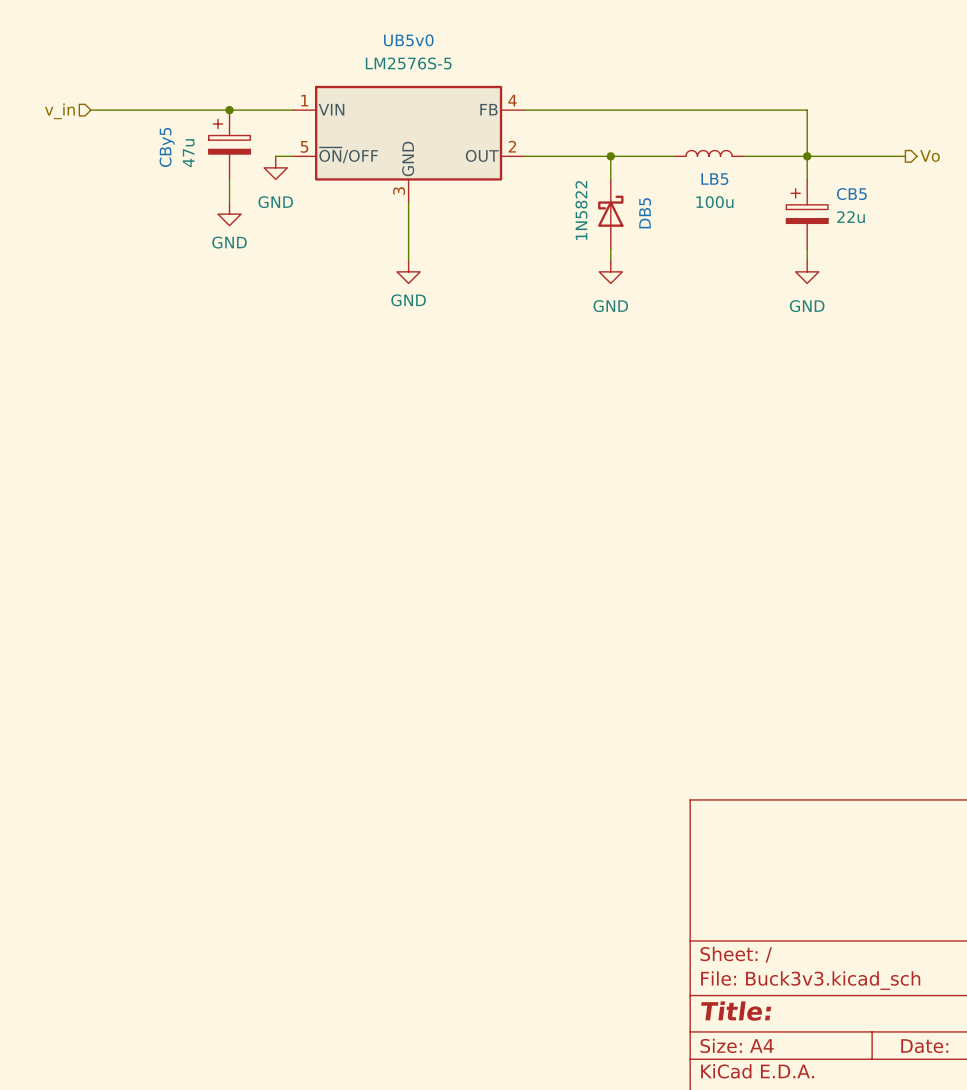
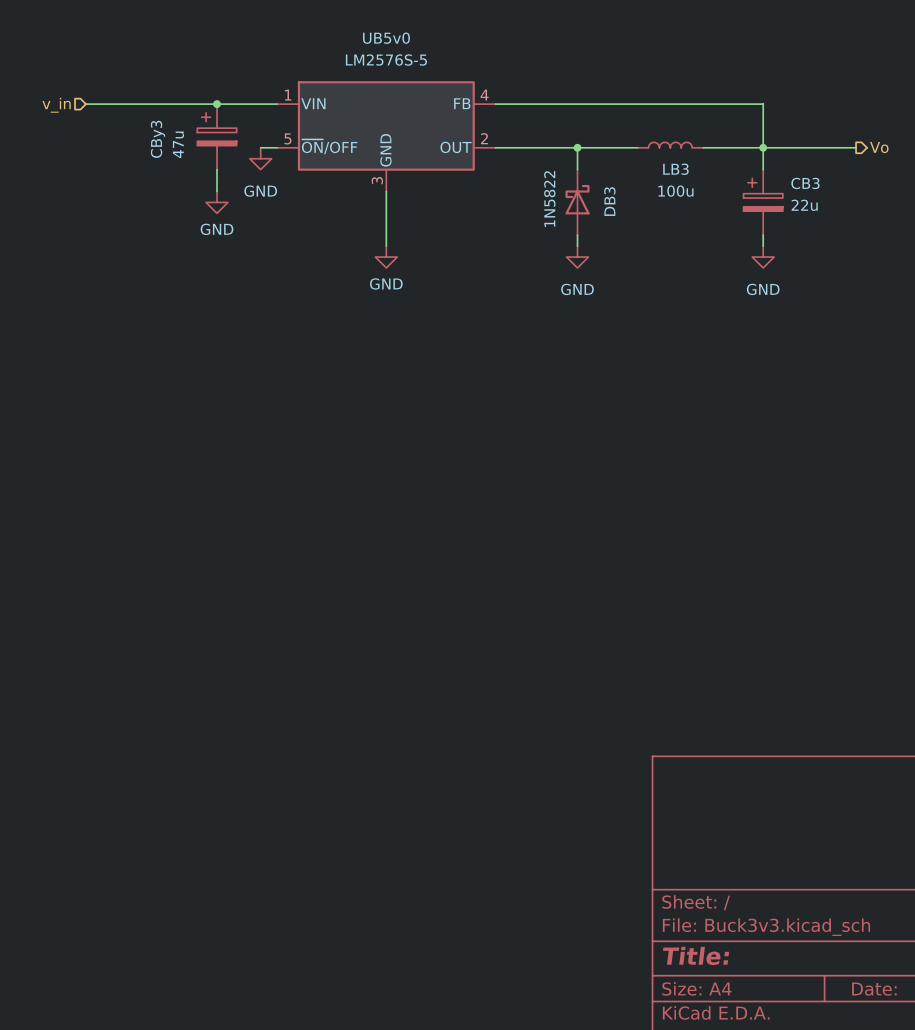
CBy5 name: CBy5 (167, 147) -> CBy3 (157, 139)
LB5 name: LB5 (714, 179) -> LB3 (675, 169)
CB5 name: CB5 (851, 194) -> CB3 (805, 183)
DB5 name: DB5 (645, 213) -> DB3 (609, 201)

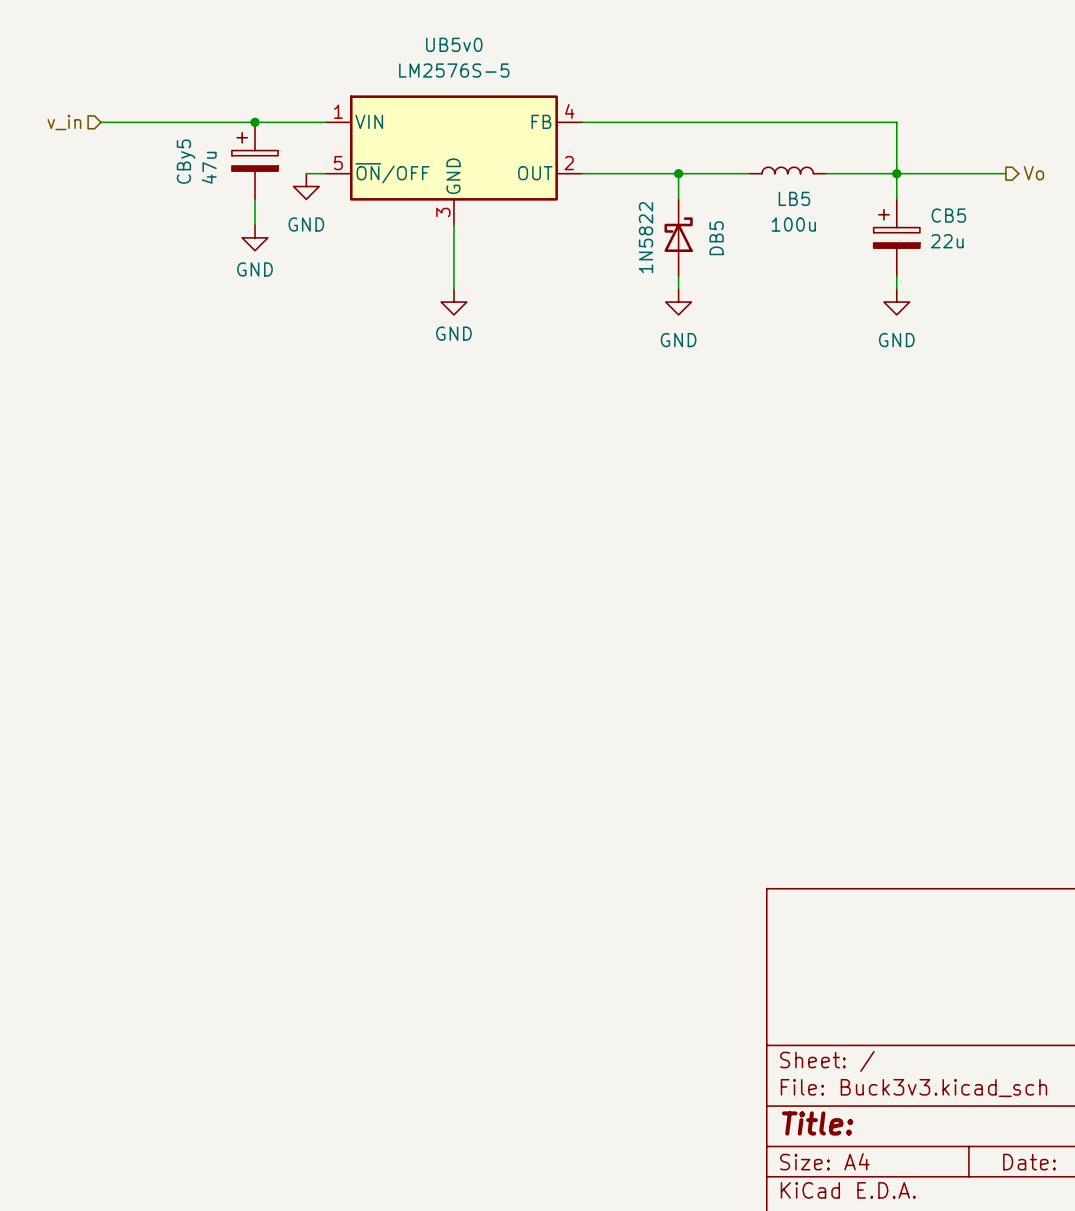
CBy3 name: CBy3 (157, 139) -> CBy5 (186, 161)
LB3 name: LB3 (675, 169) -> LB5 (794, 198)
CB3 name: CB3 (805, 183) -> CB5 (948, 215)
DB3 name: DB3 (609, 201) -> DB5 (716, 238)

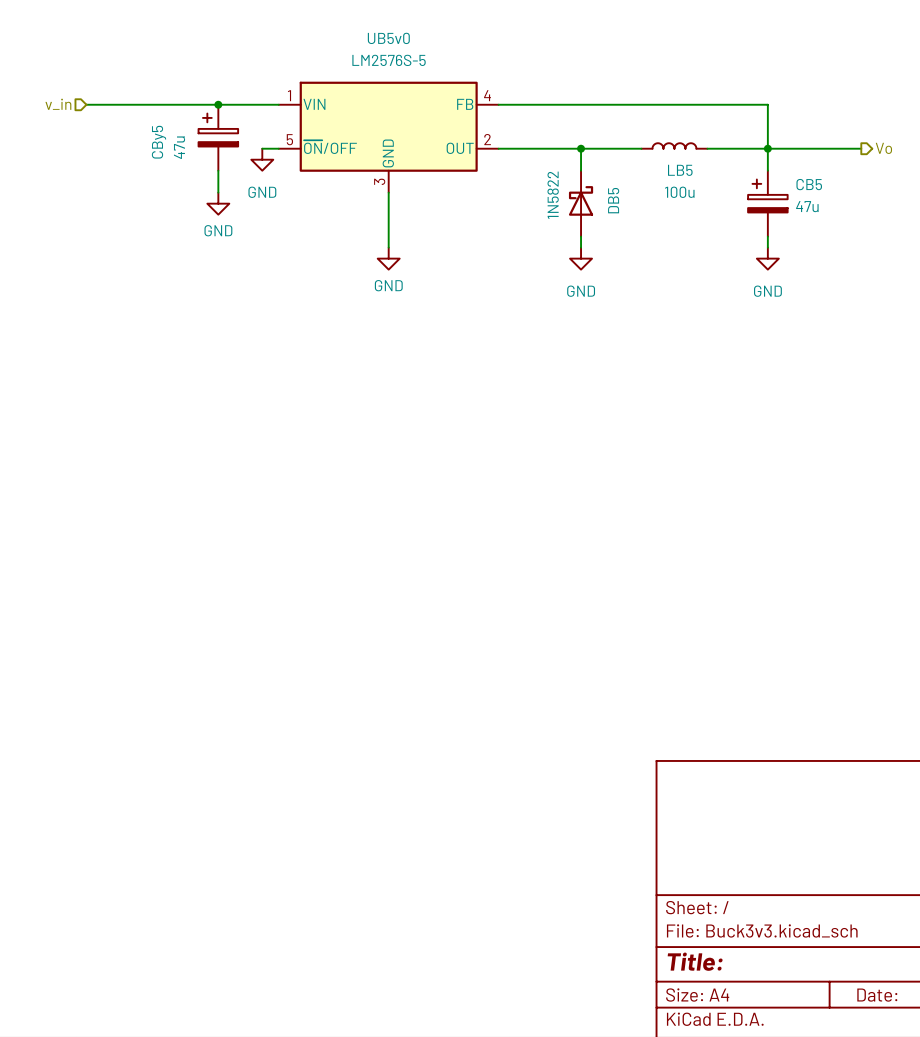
CB5 value: 22u (947, 241) -> 47u (807, 206)

